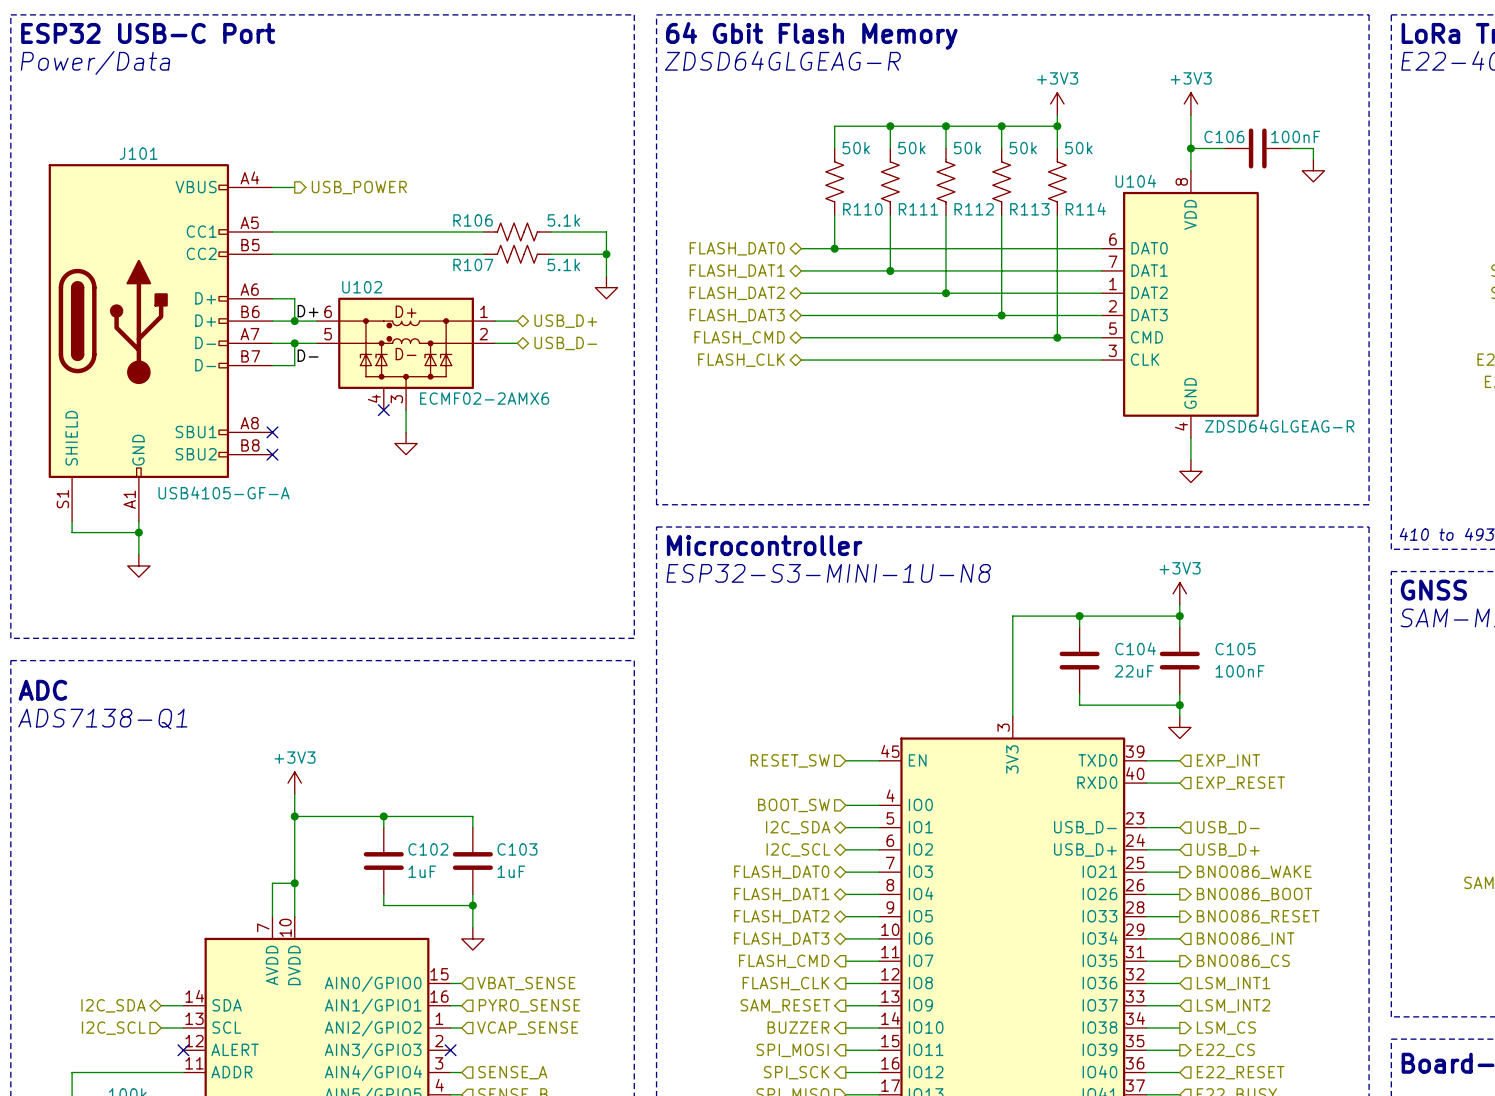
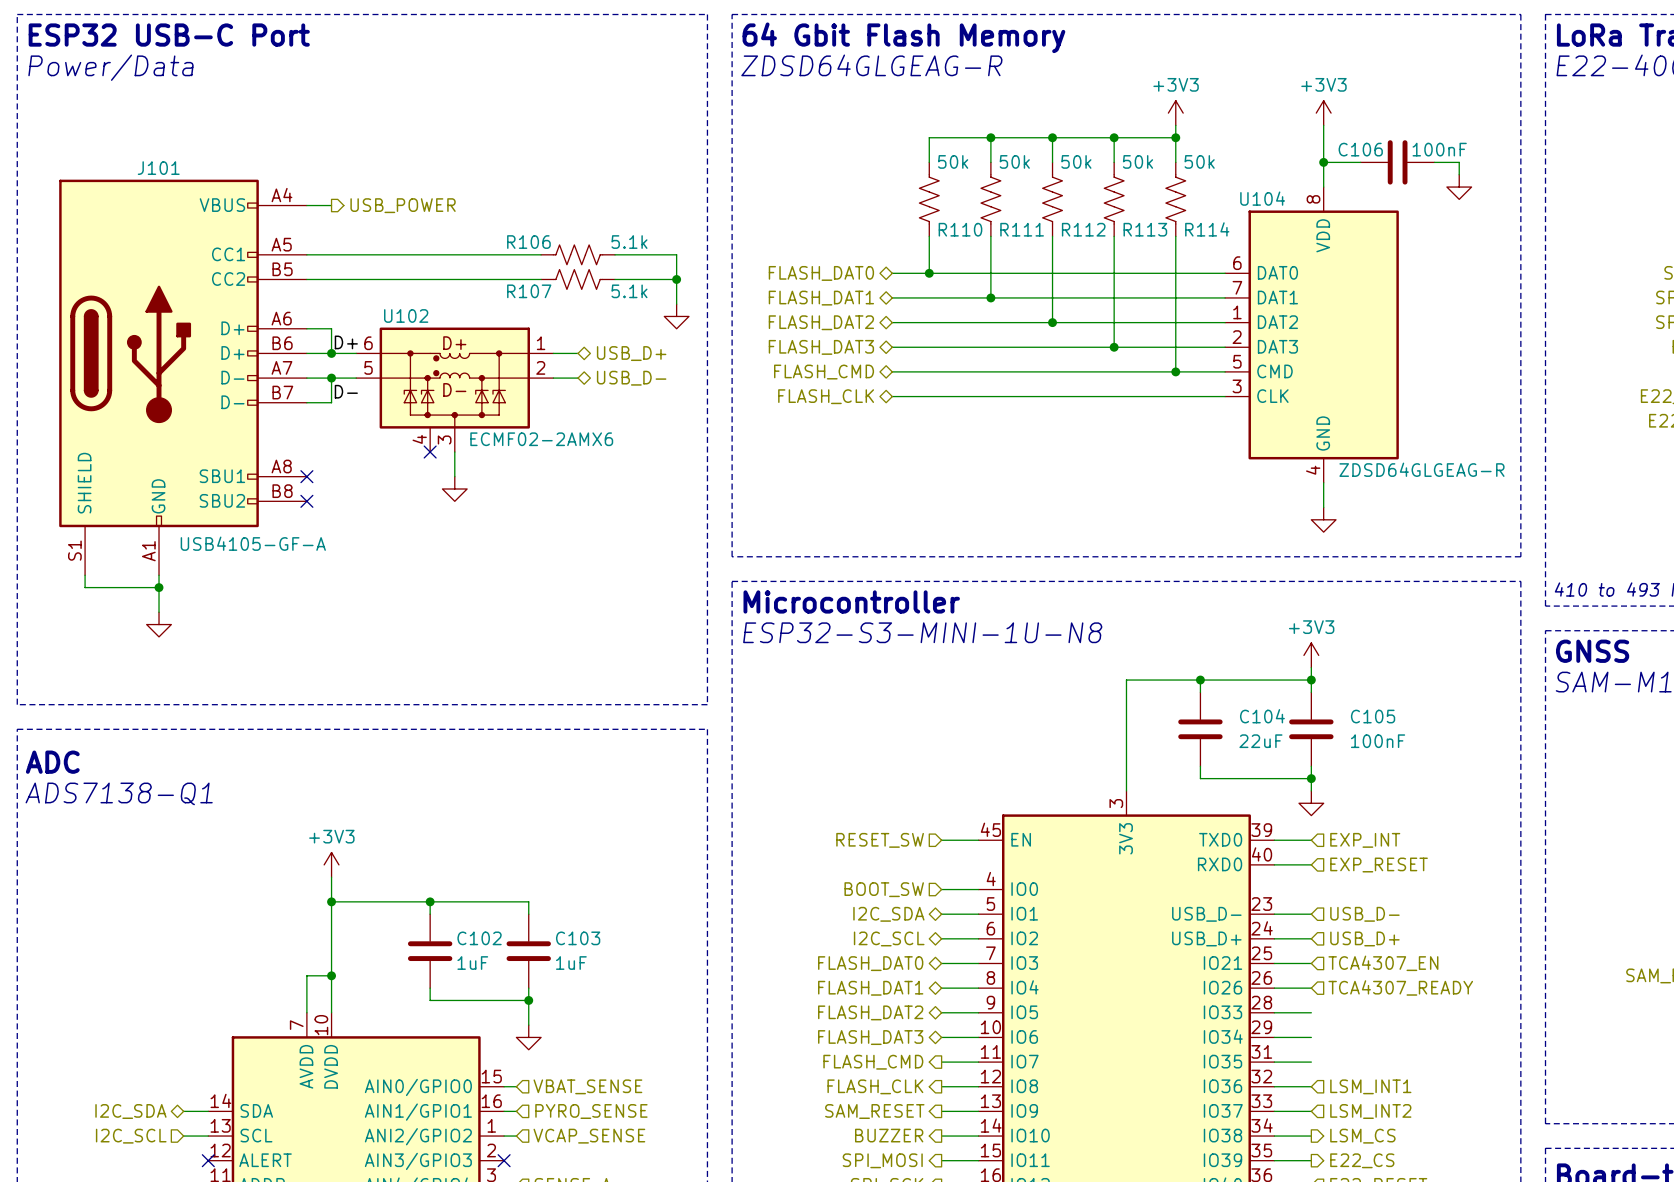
hierarchical label shape: output (1254, 872) -> input (1383, 963)
hierarchical label: BNO086_WAKE (1254, 872) -> TCA4307_EN (1383, 963)
hierarchical label shape: output (1254, 894) -> input (1400, 987)
hierarchical label: BNO086_BOOT (1254, 894) -> TCA4307_READY (1400, 987)
hierarchical label: BNO086_RESET (1258, 916) -> none
hierarchical label: BNO086_INT (1245, 939) -> none
hierarchical label: BNO086_CS (1243, 961) -> none

